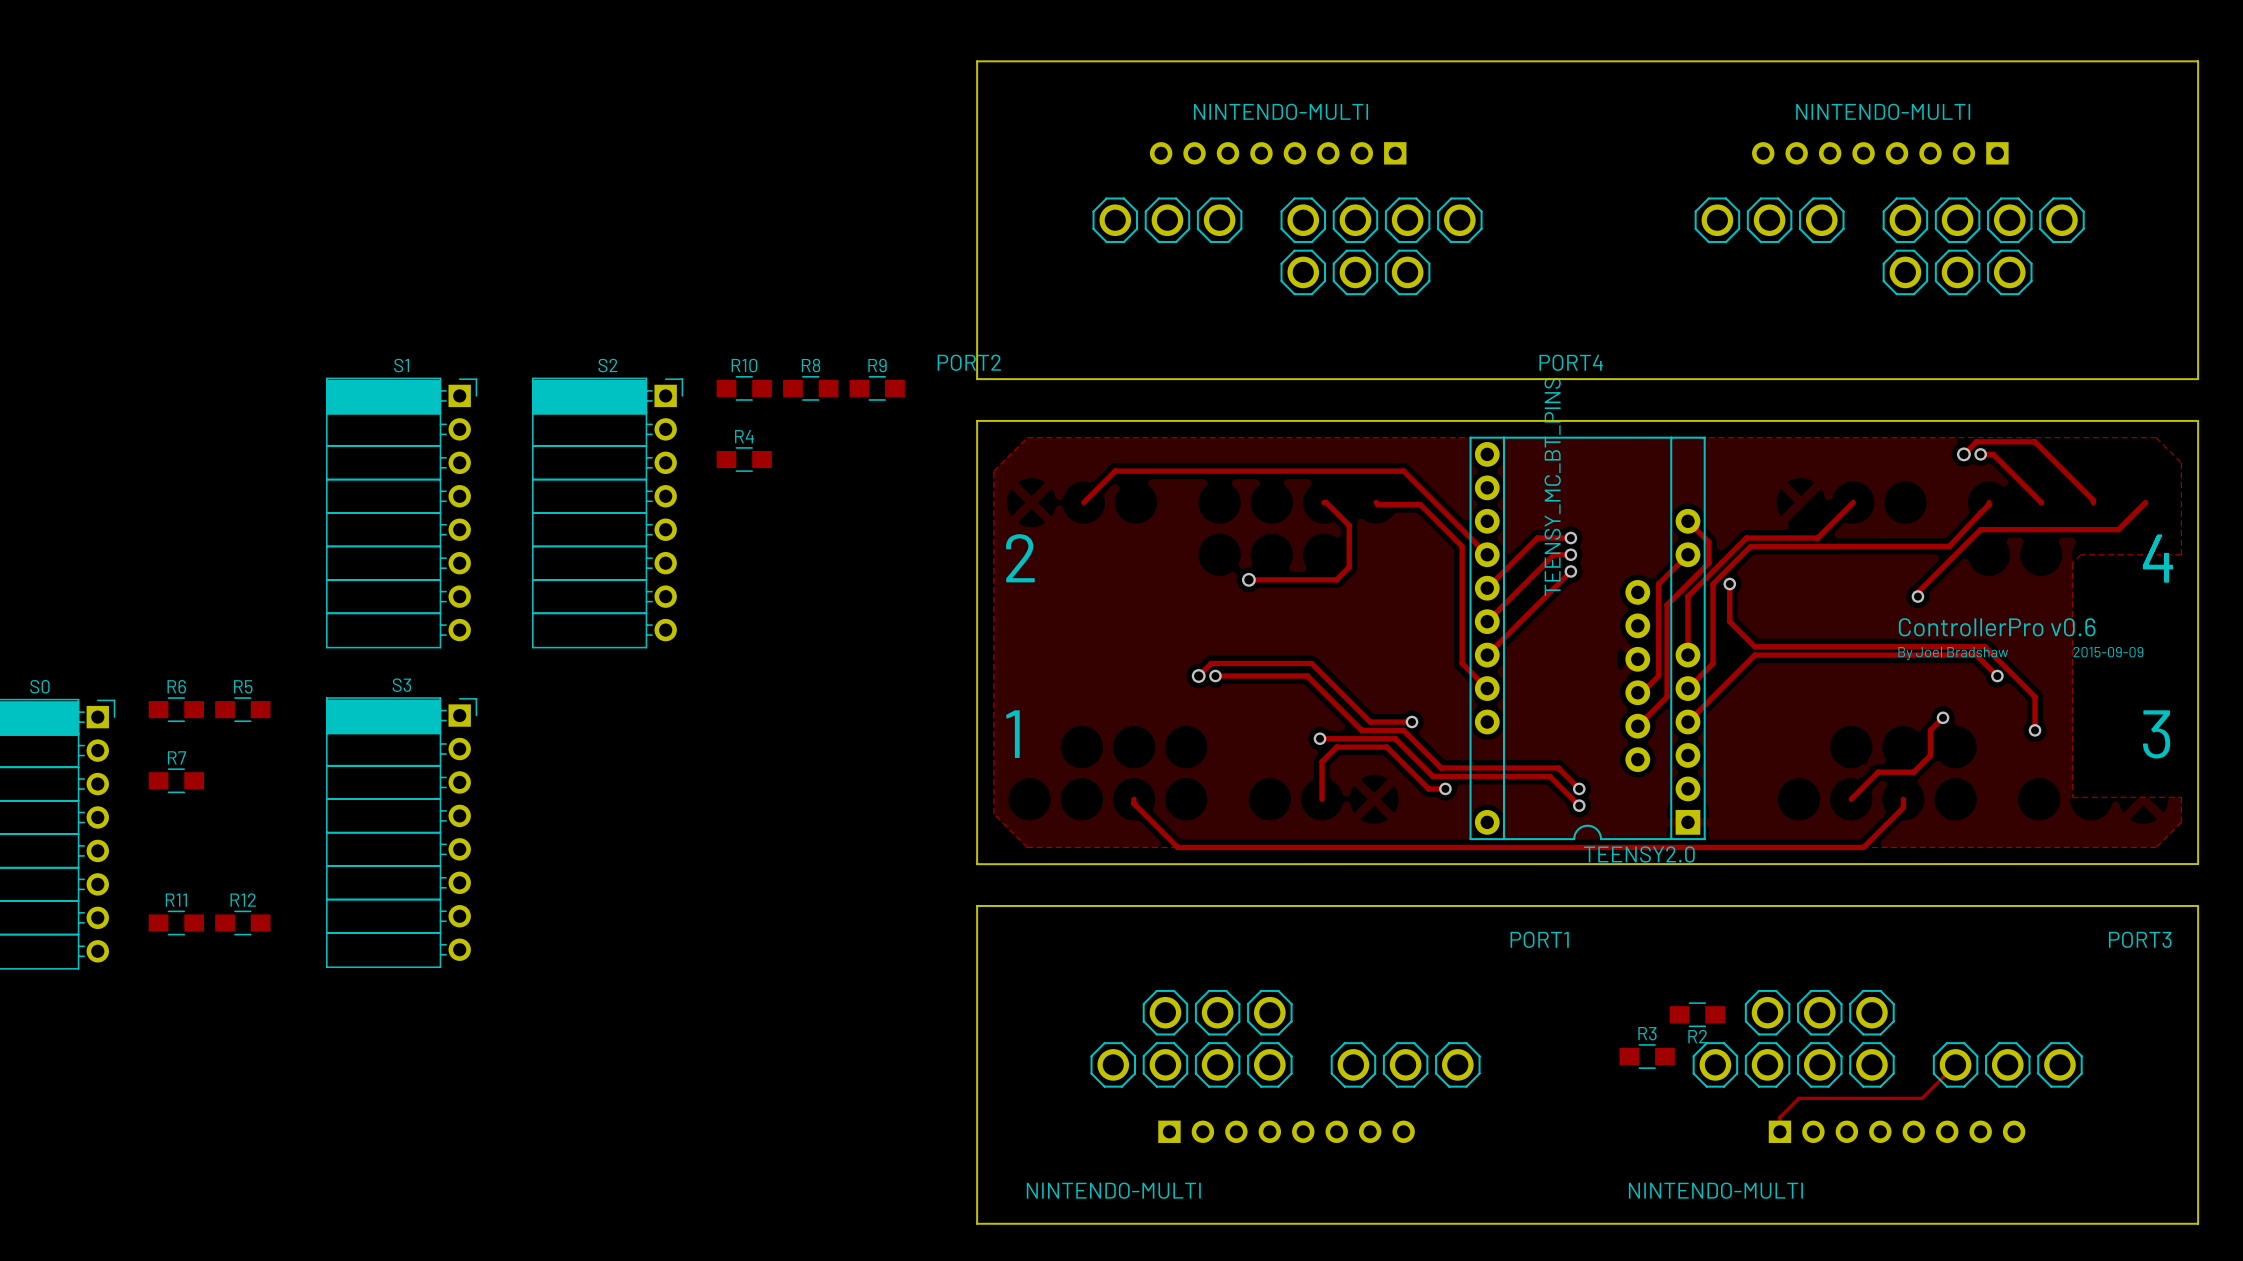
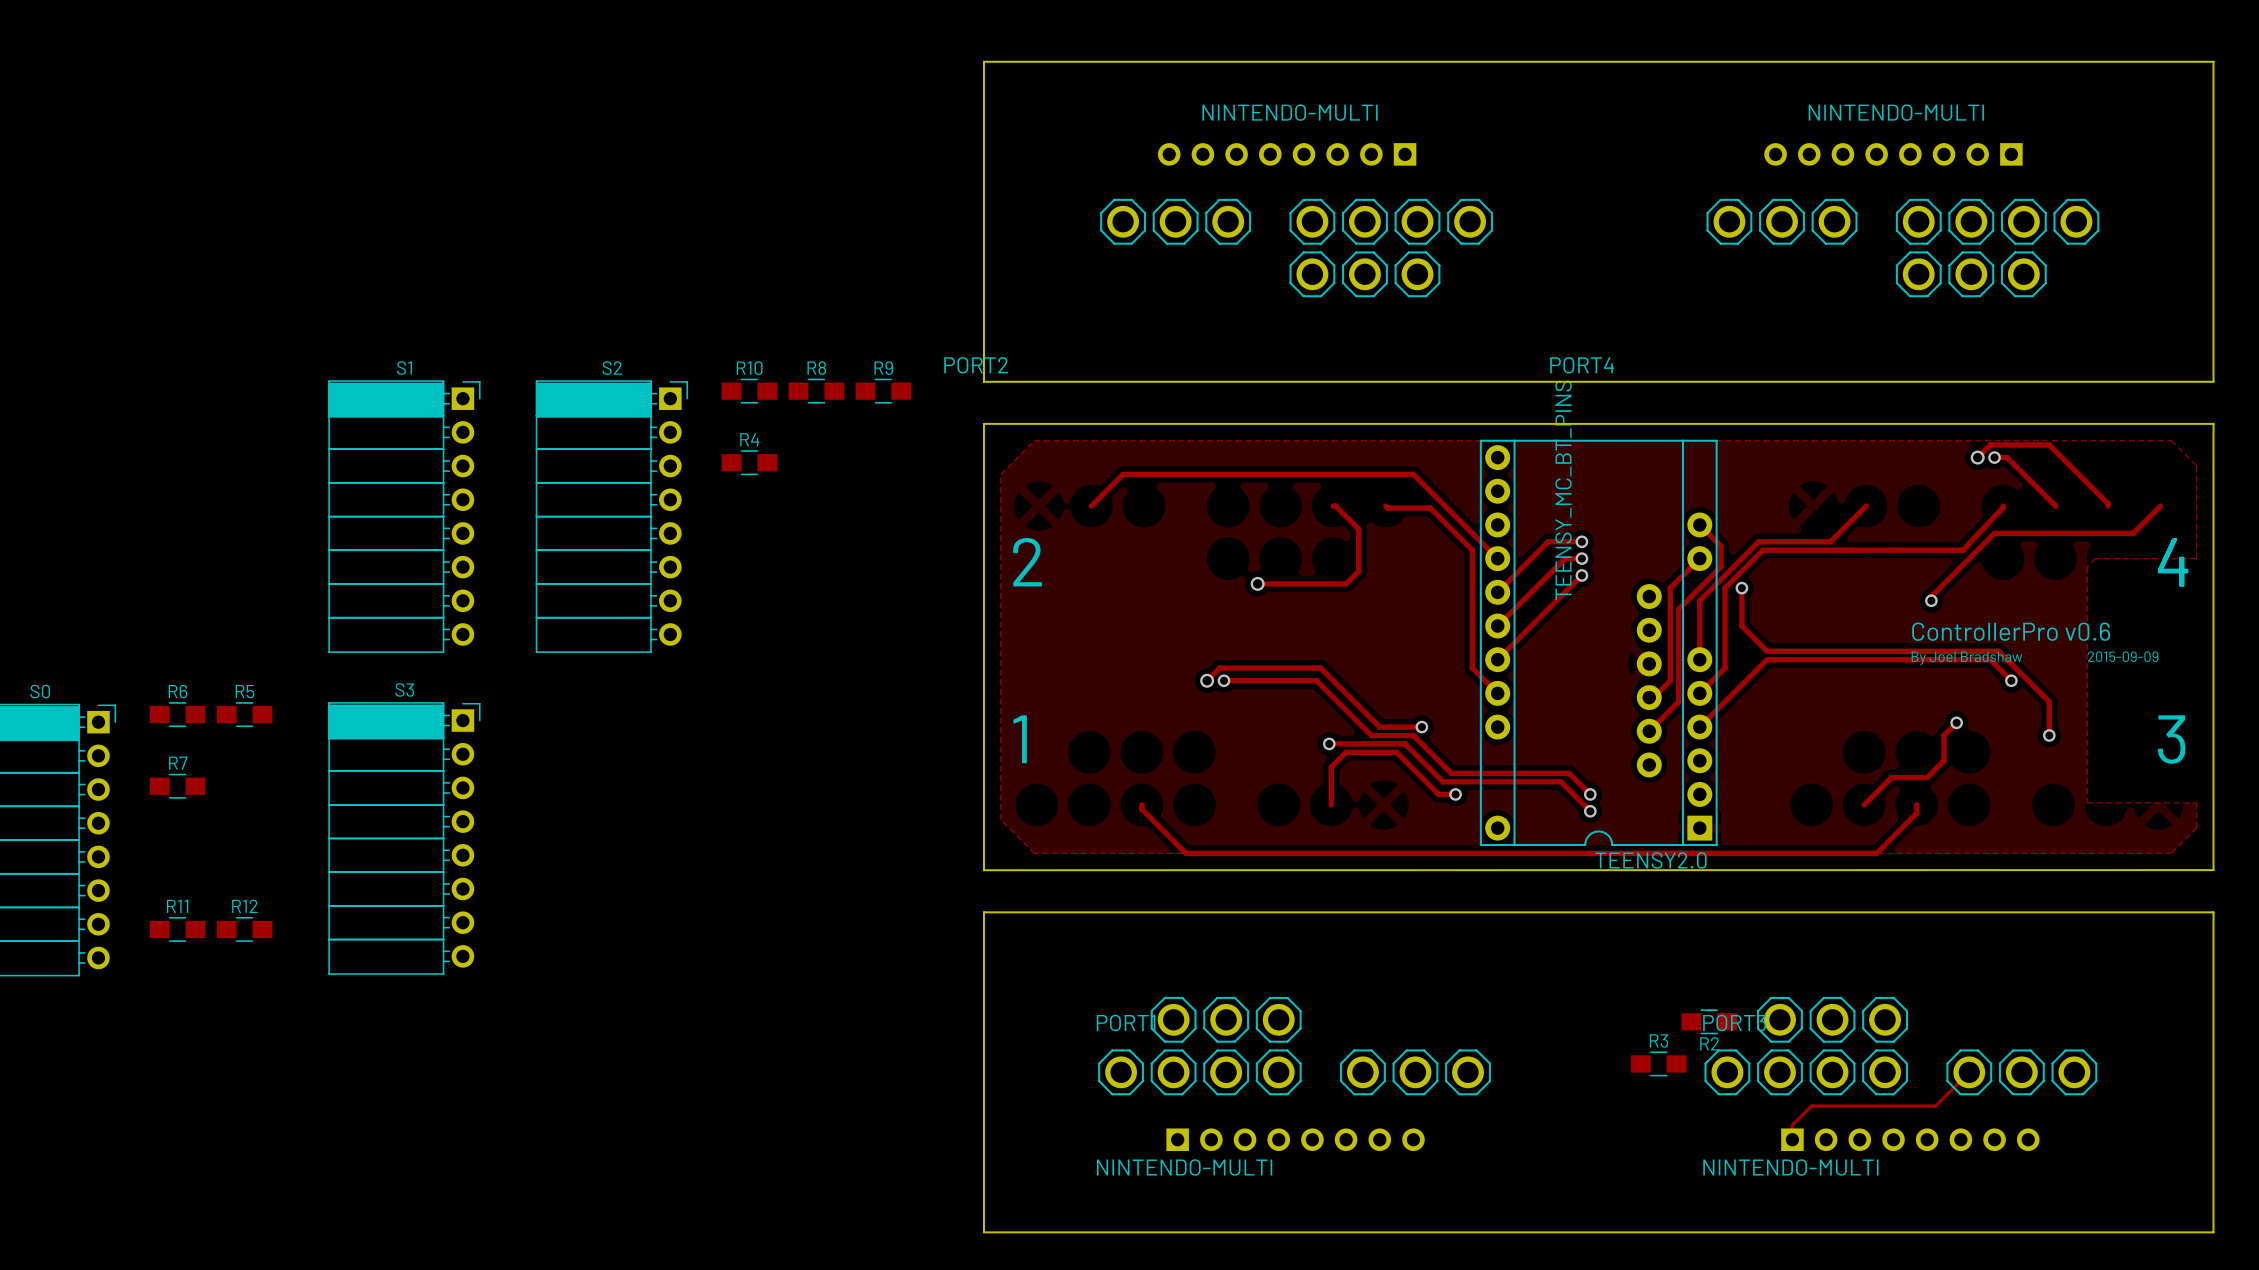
PORT1 name position: PORT1 (1539, 939) -> PORT1 (1126, 1022)
PORT3 name position: PORT3 (2140, 939) -> PORT3 (1734, 1022)
PORT1 value position: NINTENDO-MULTI (1113, 1190) -> NINTENDO-MULTI (1184, 1167)
PORT3 value position: NINTENDO-MULTI (1715, 1190) -> NINTENDO-MULTI (1790, 1167)

